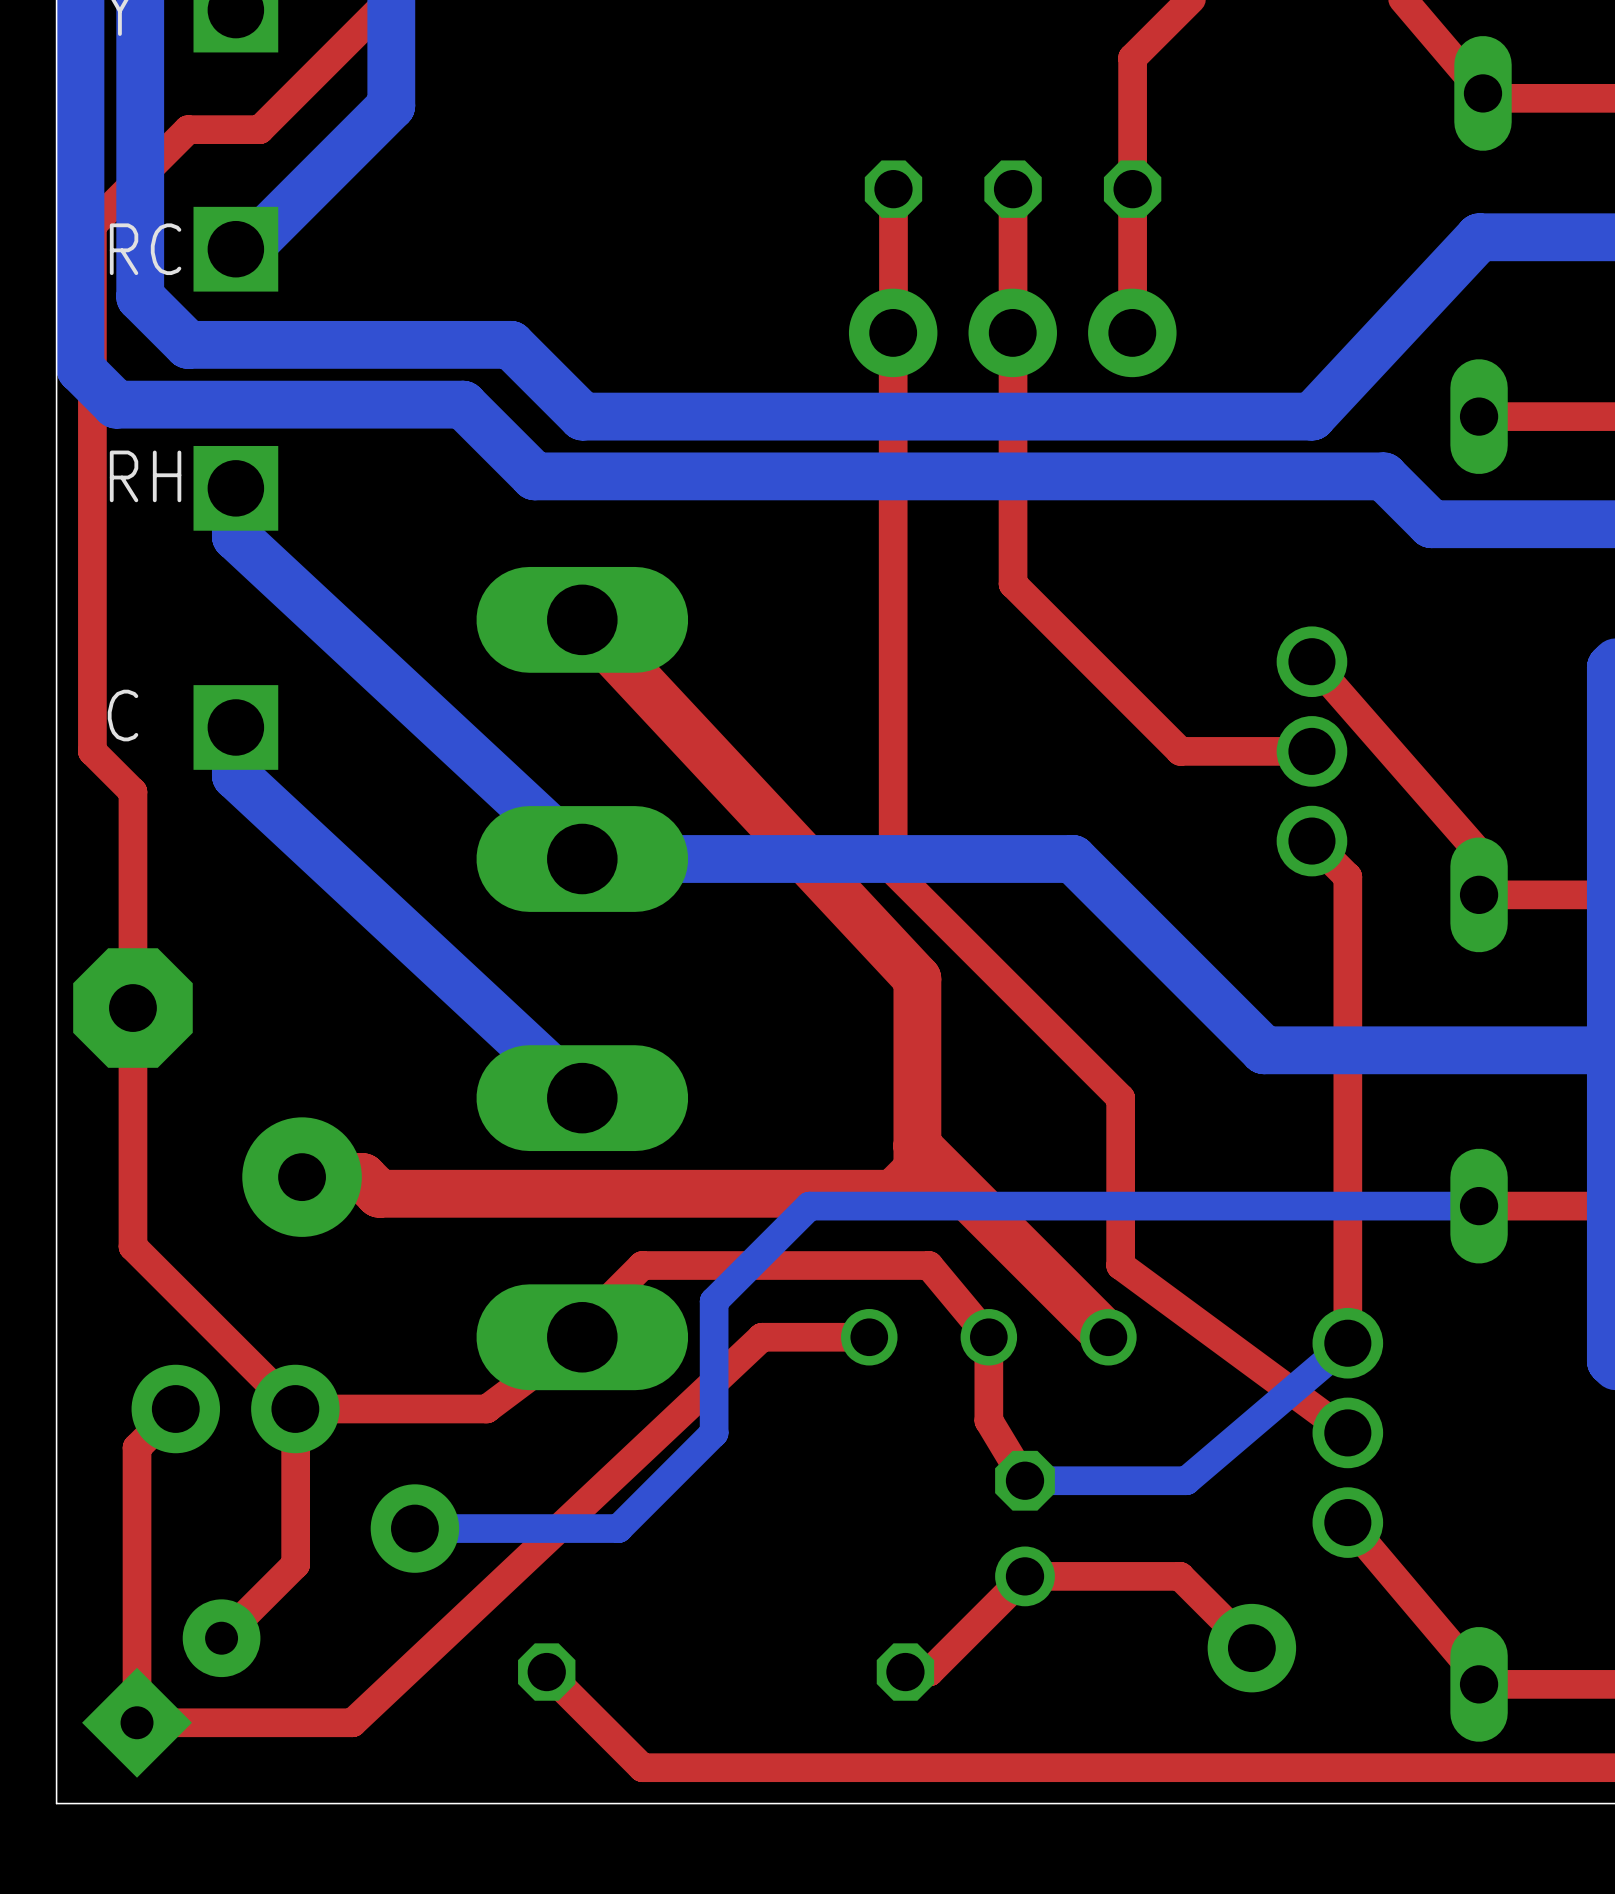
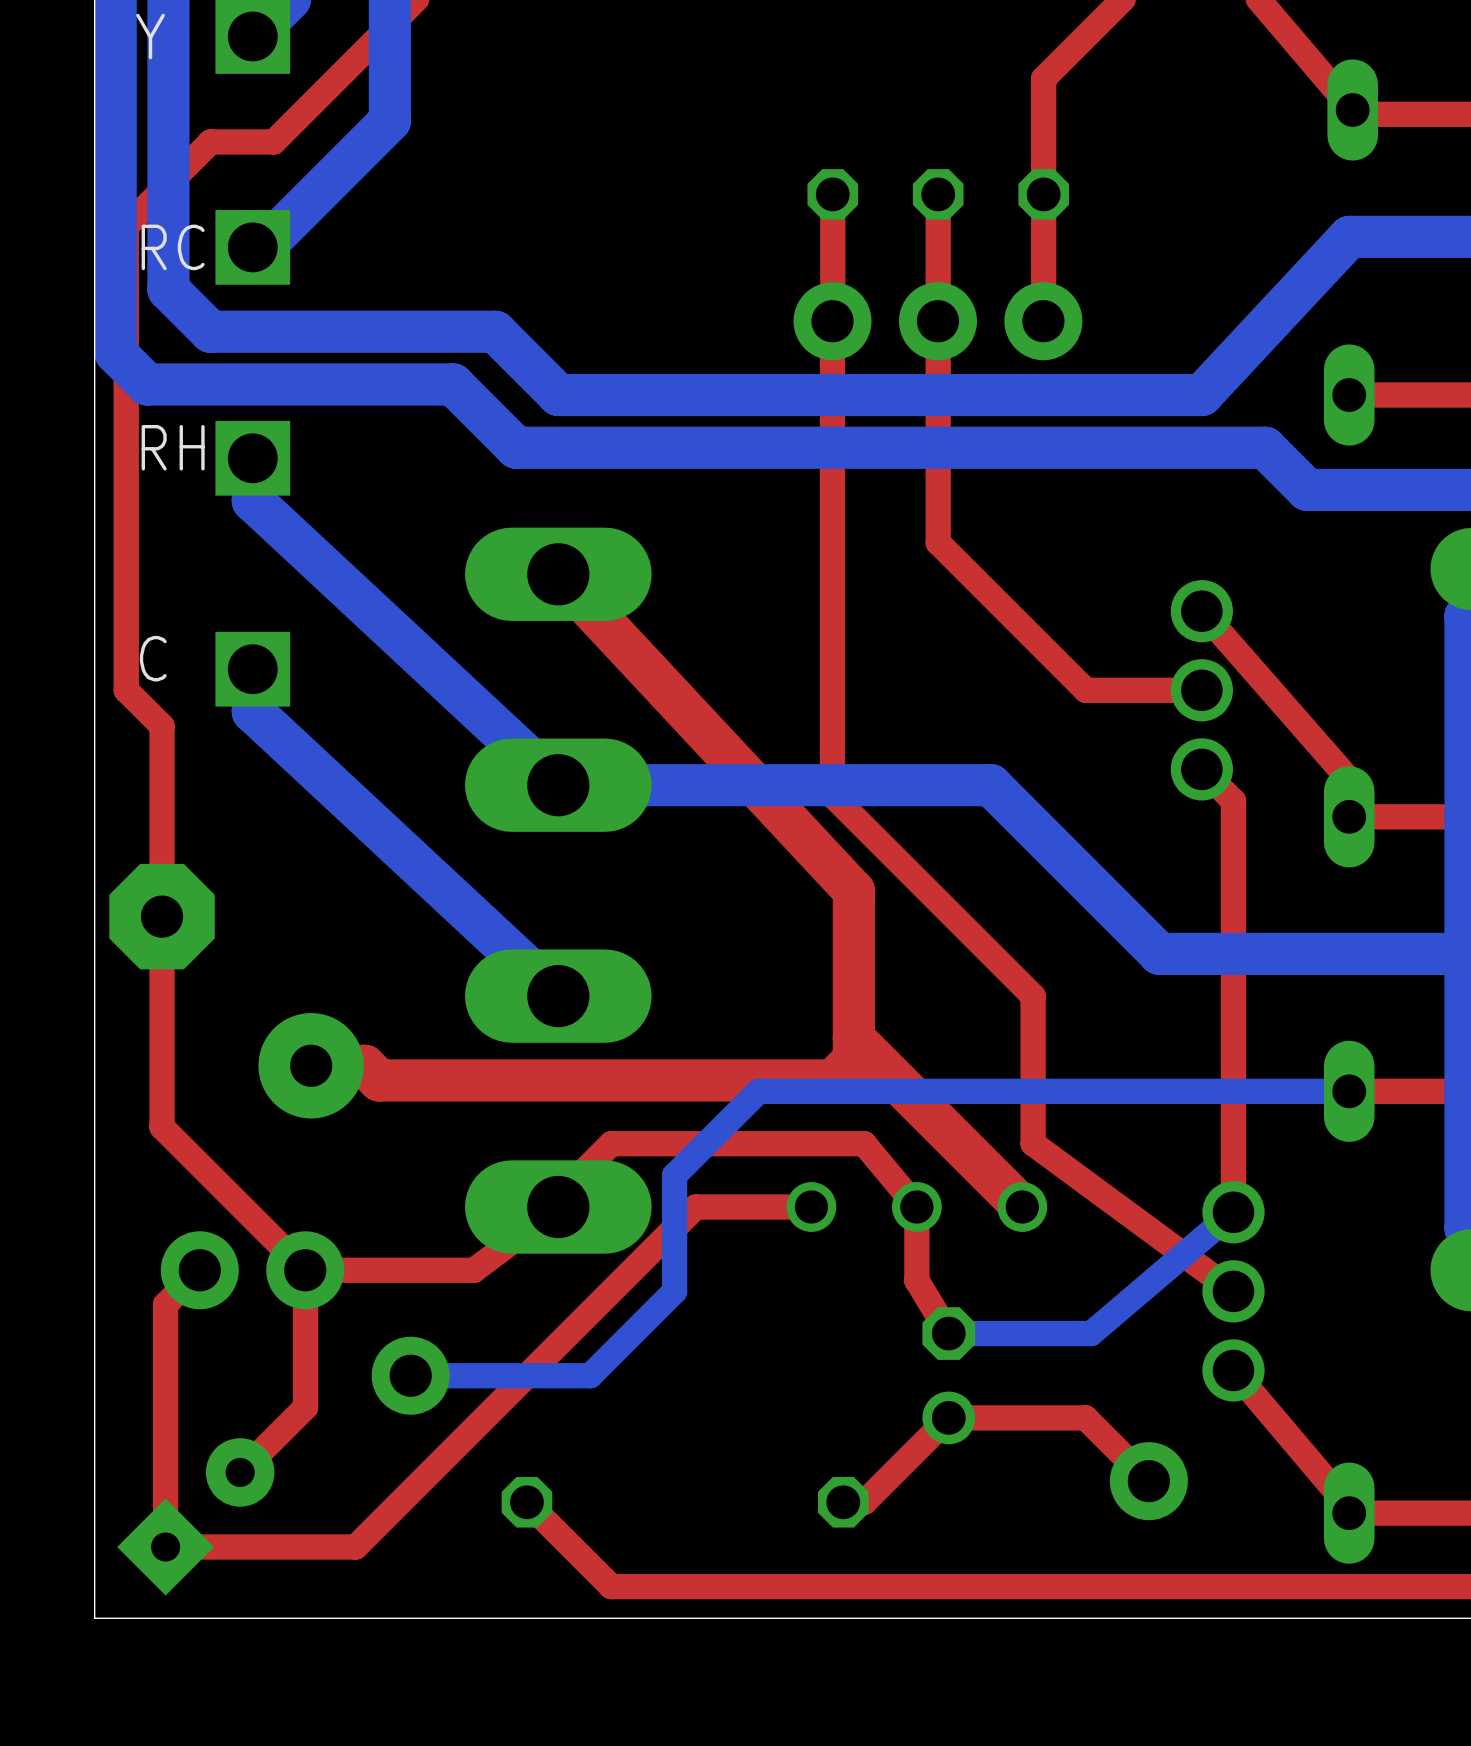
top track: (761, 1337) (352, 1722) -> (716, 1207) (695, 1207) (355, 1547)

